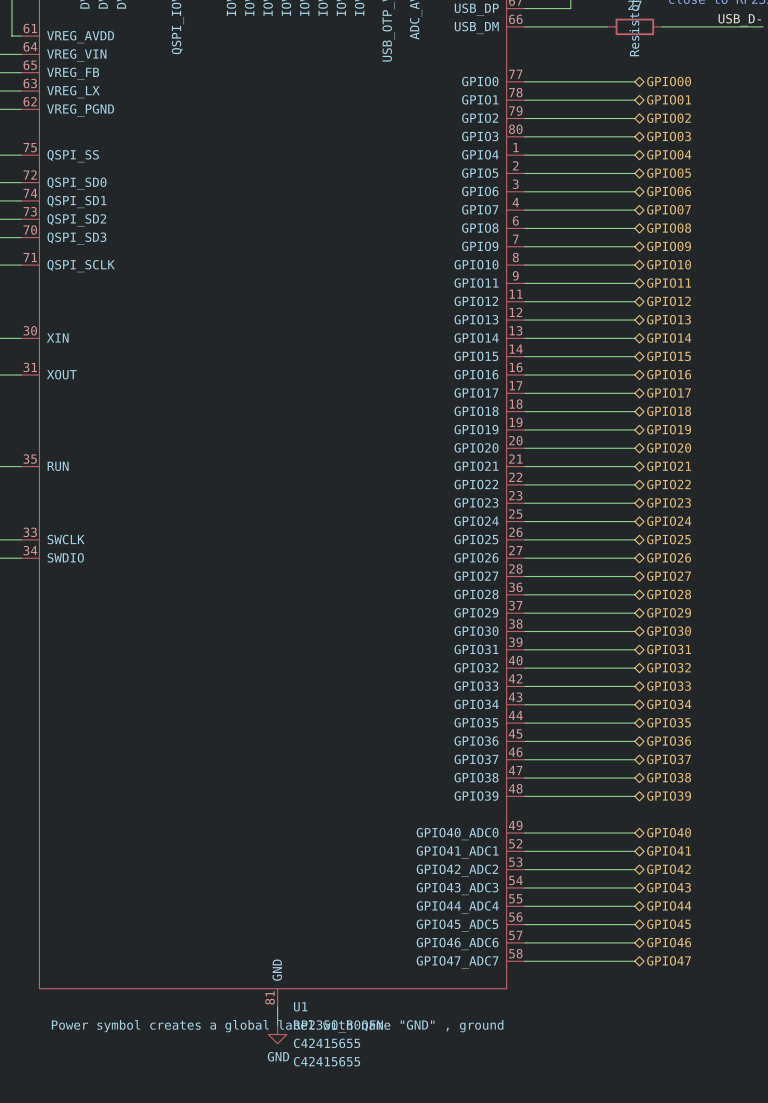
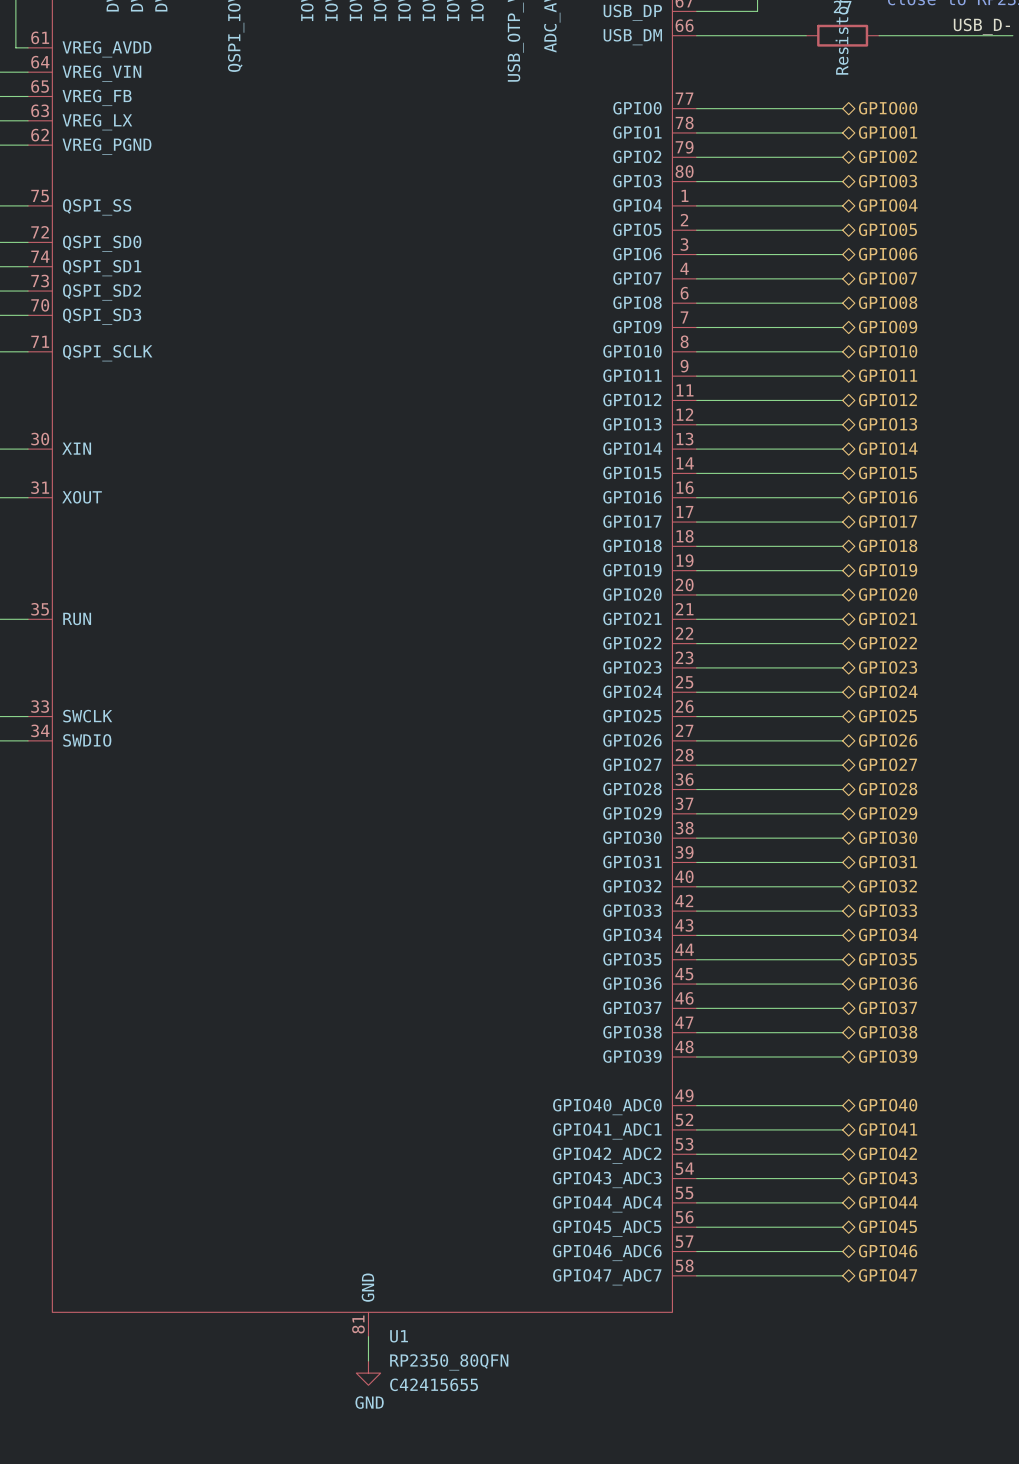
power symbol text: Power symbol creates a global label with name "GND" , ground (277, 1026) -> none
U1 text: C42415655 (327, 1061) -> none

